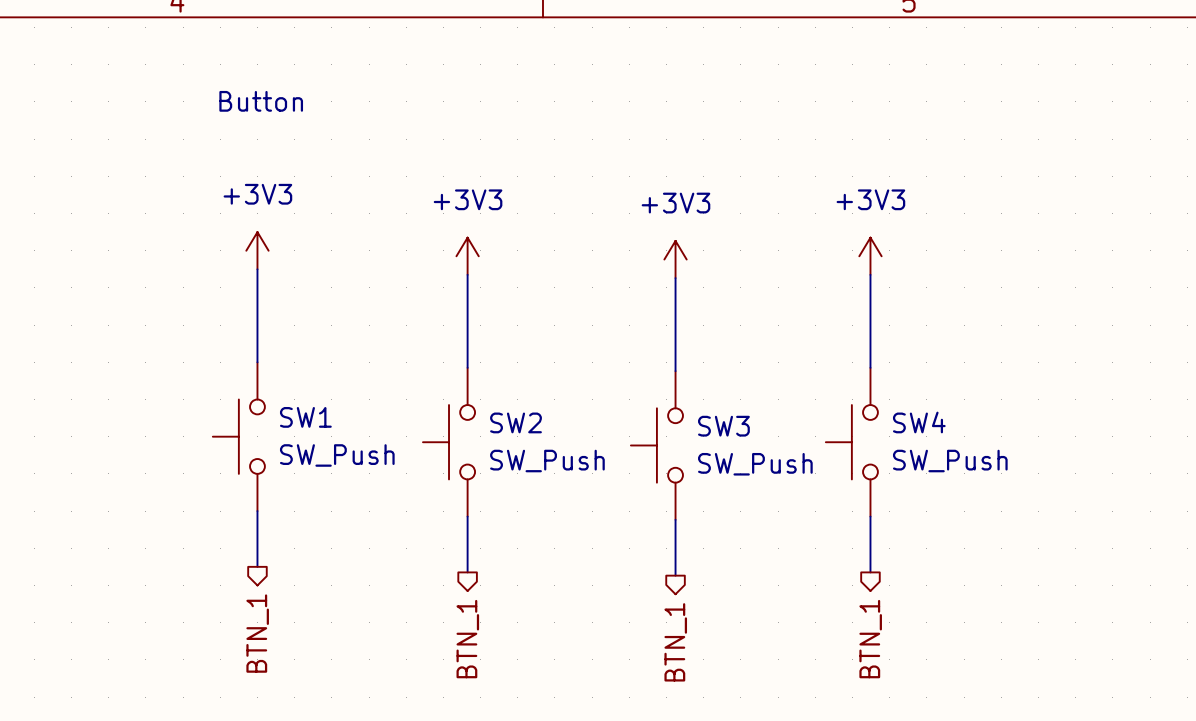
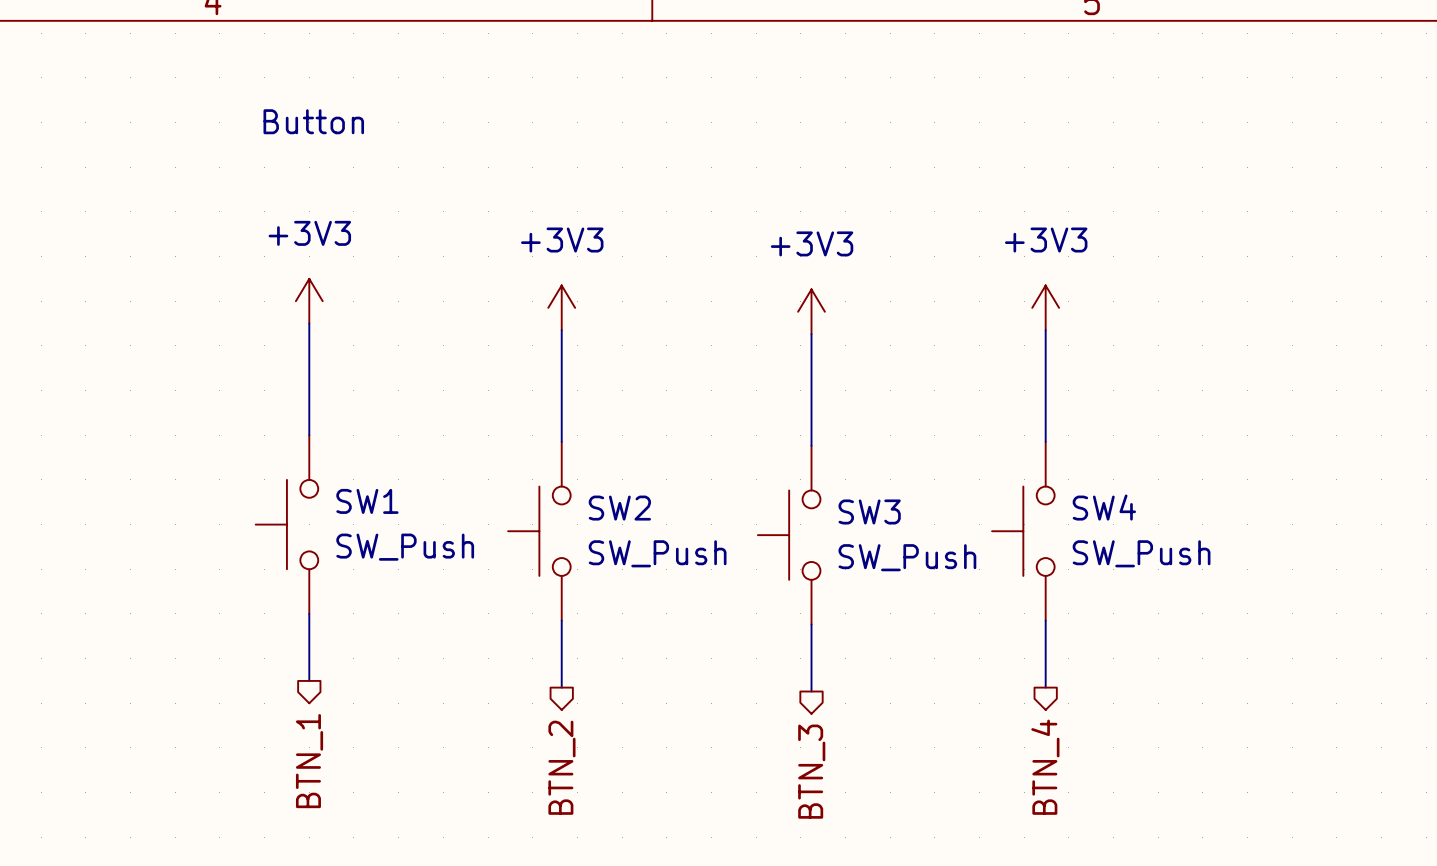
hierarchical label: BTN_1 (467, 639) -> BTN_2 (561, 767)
hierarchical label: BTN_1 (870, 639) -> BTN_4 (1045, 767)
hierarchical label: BTN_1 (675, 642) -> BTN_3 (811, 771)

